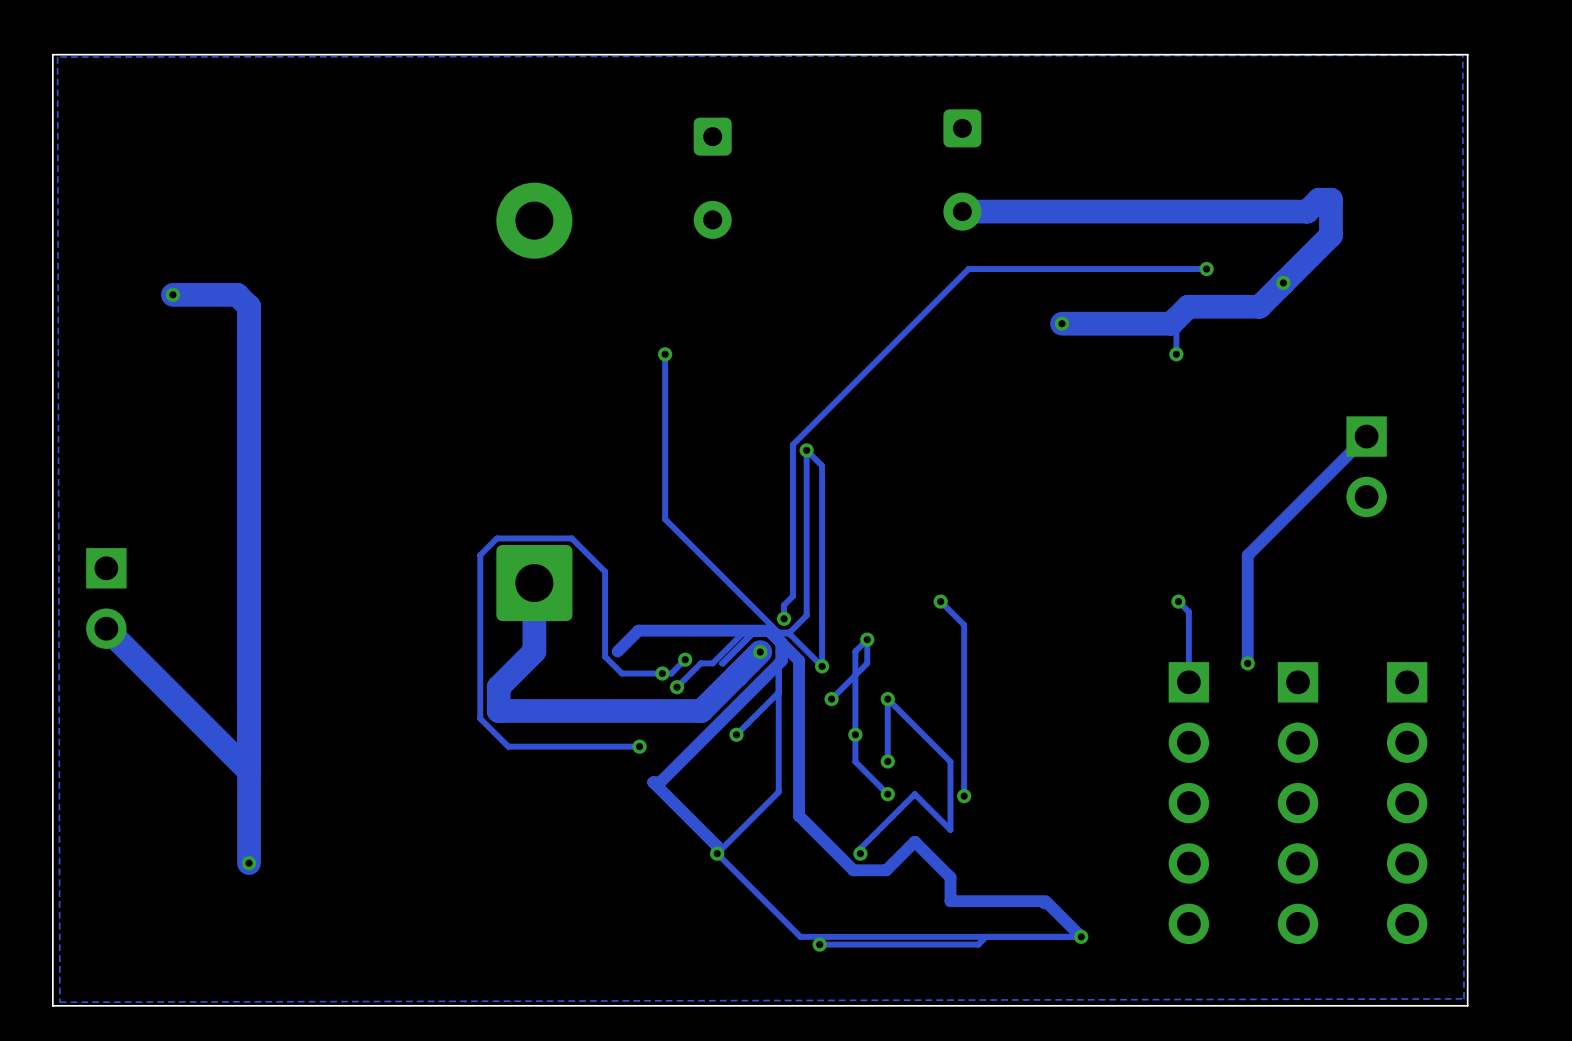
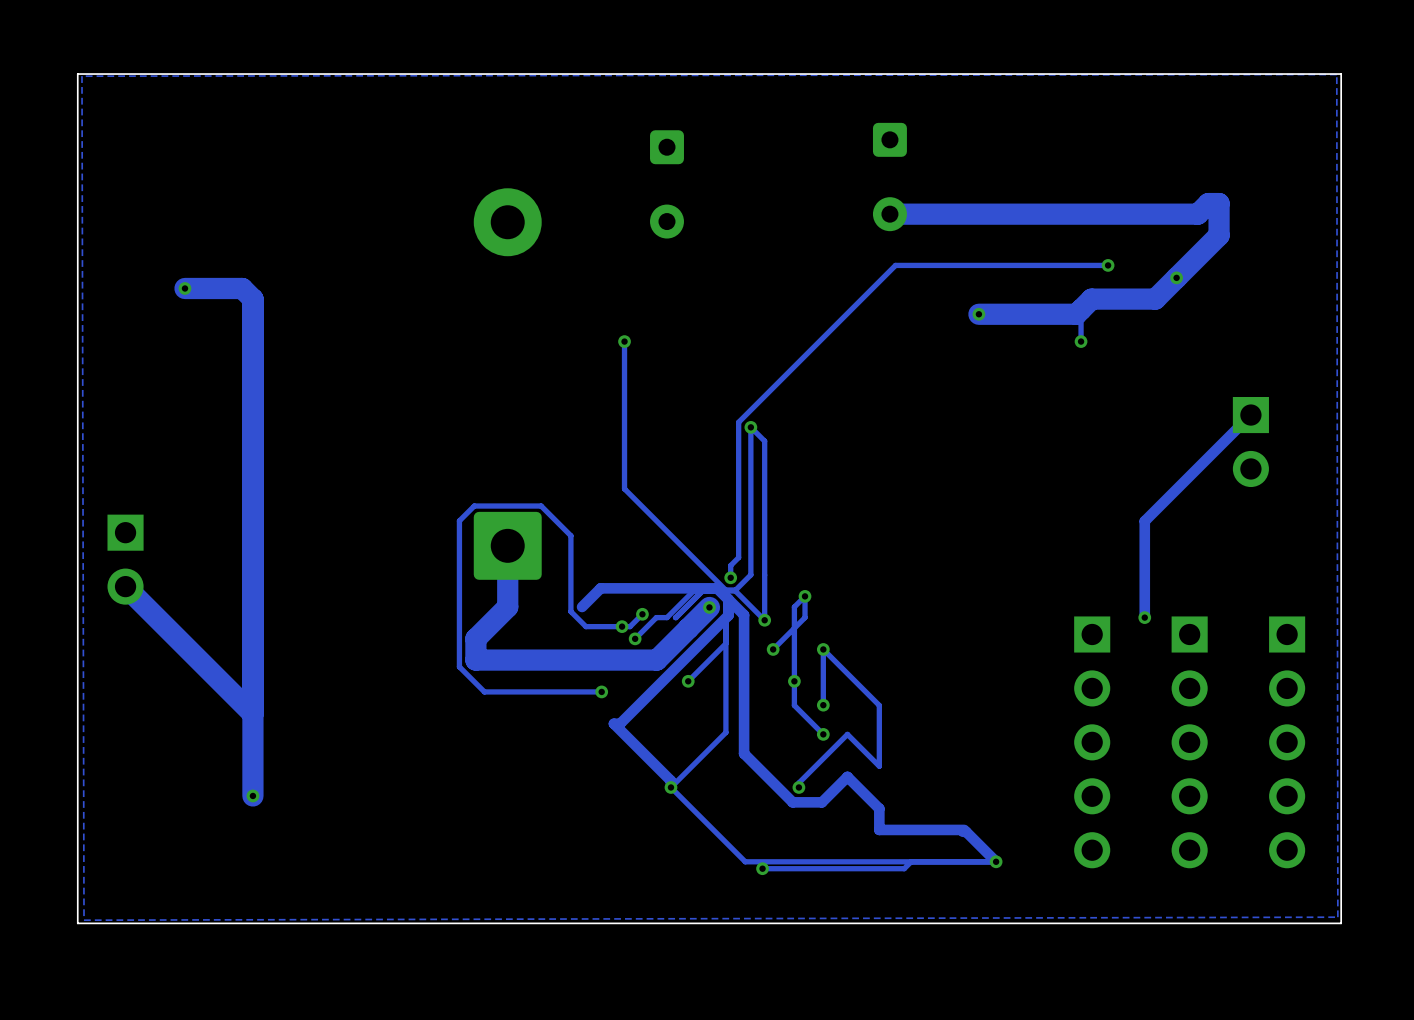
track: (940, 601) (964, 625) (964, 796) -> none
via: (940, 601) -> none
track: (1178, 601) (1188, 611) (1188, 682) -> none
via: (1178, 601) -> none
via: (964, 796) -> none

